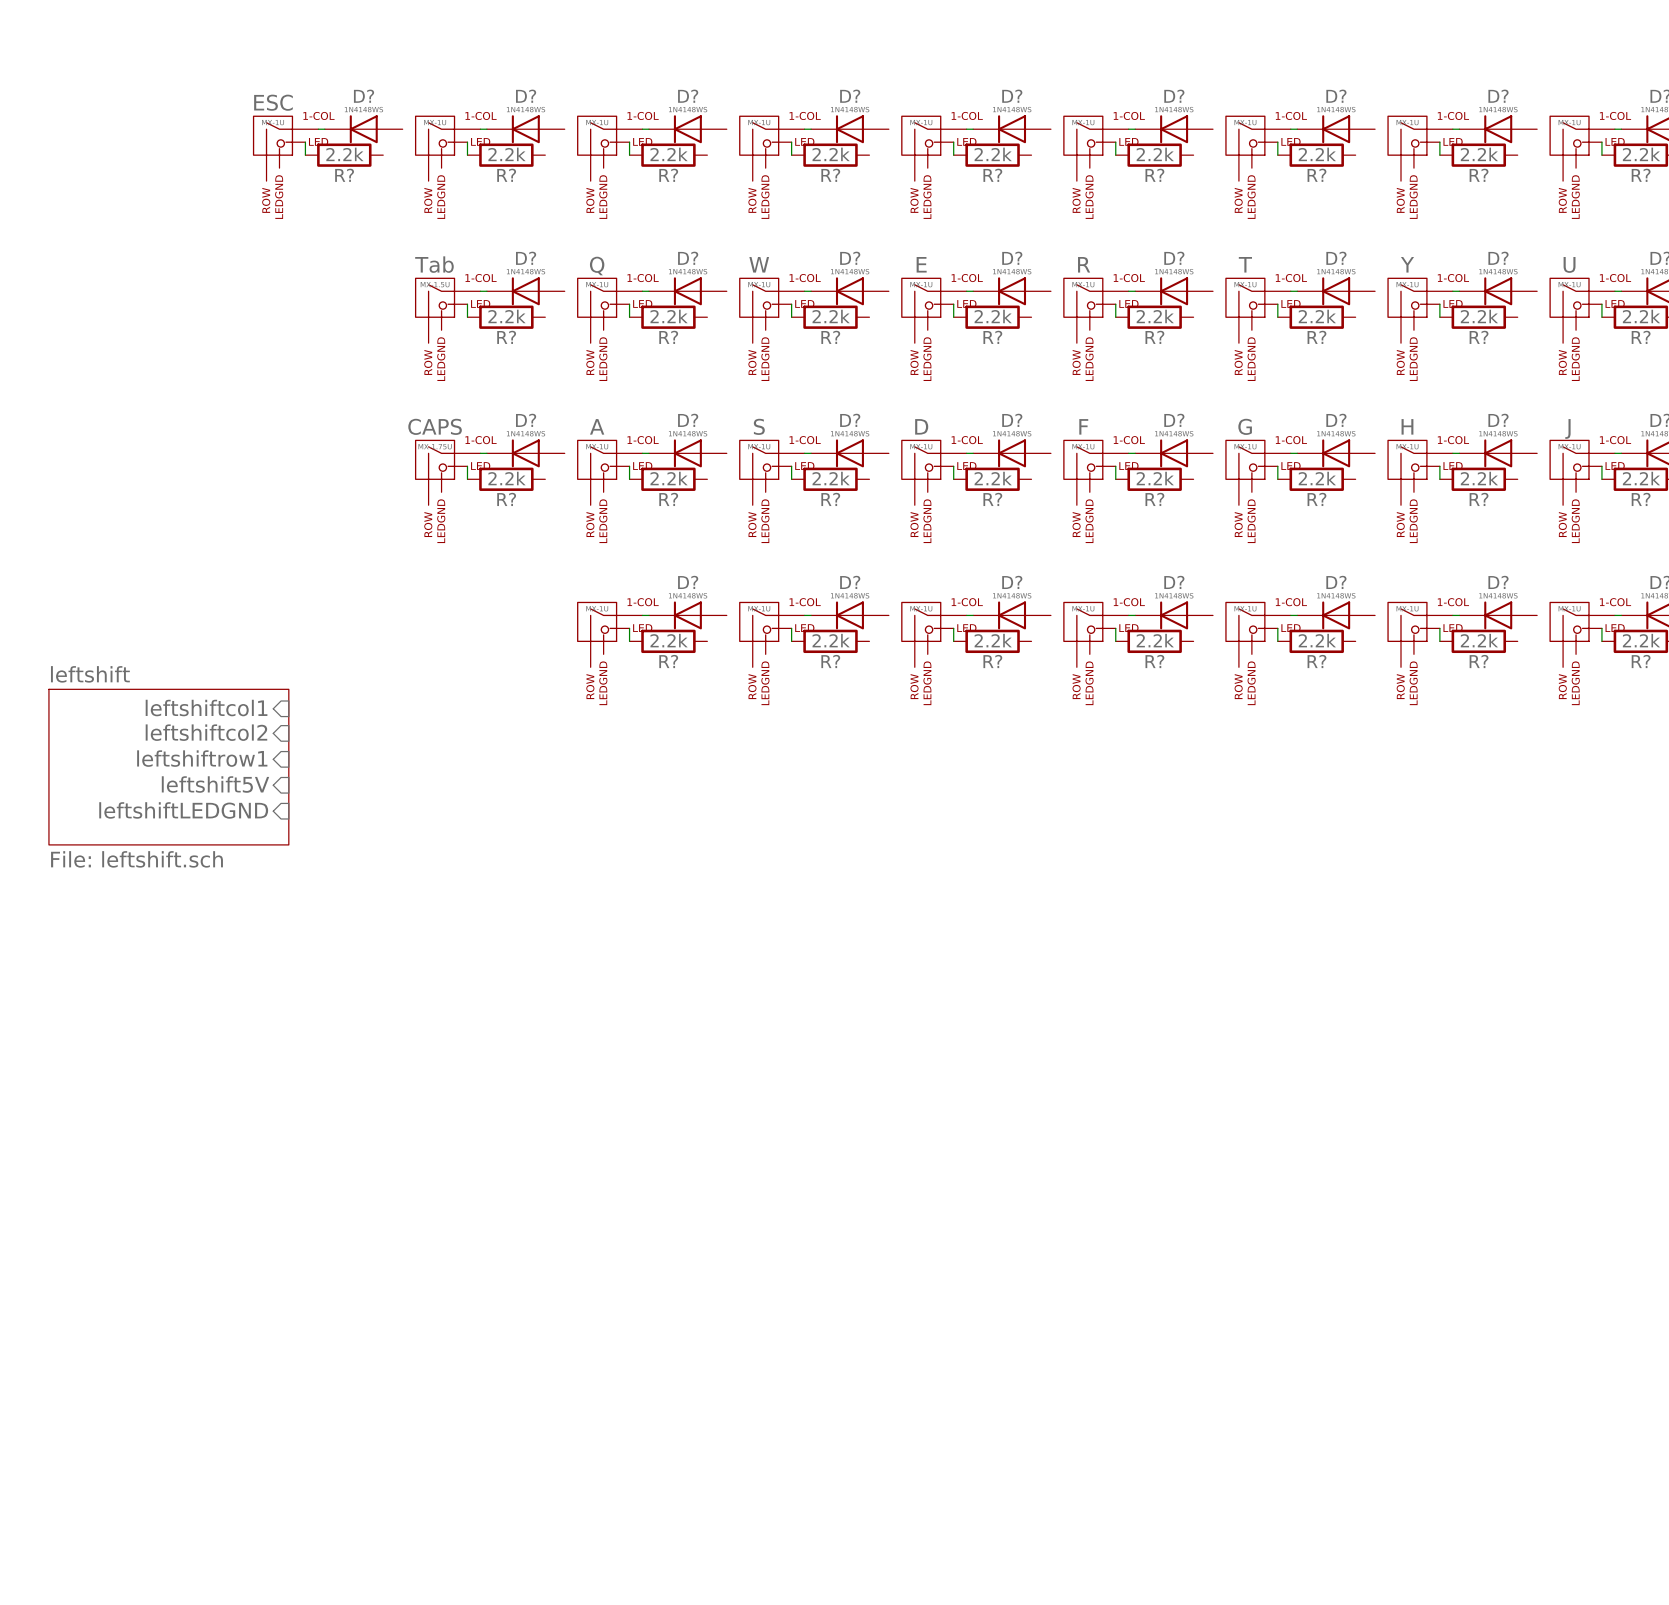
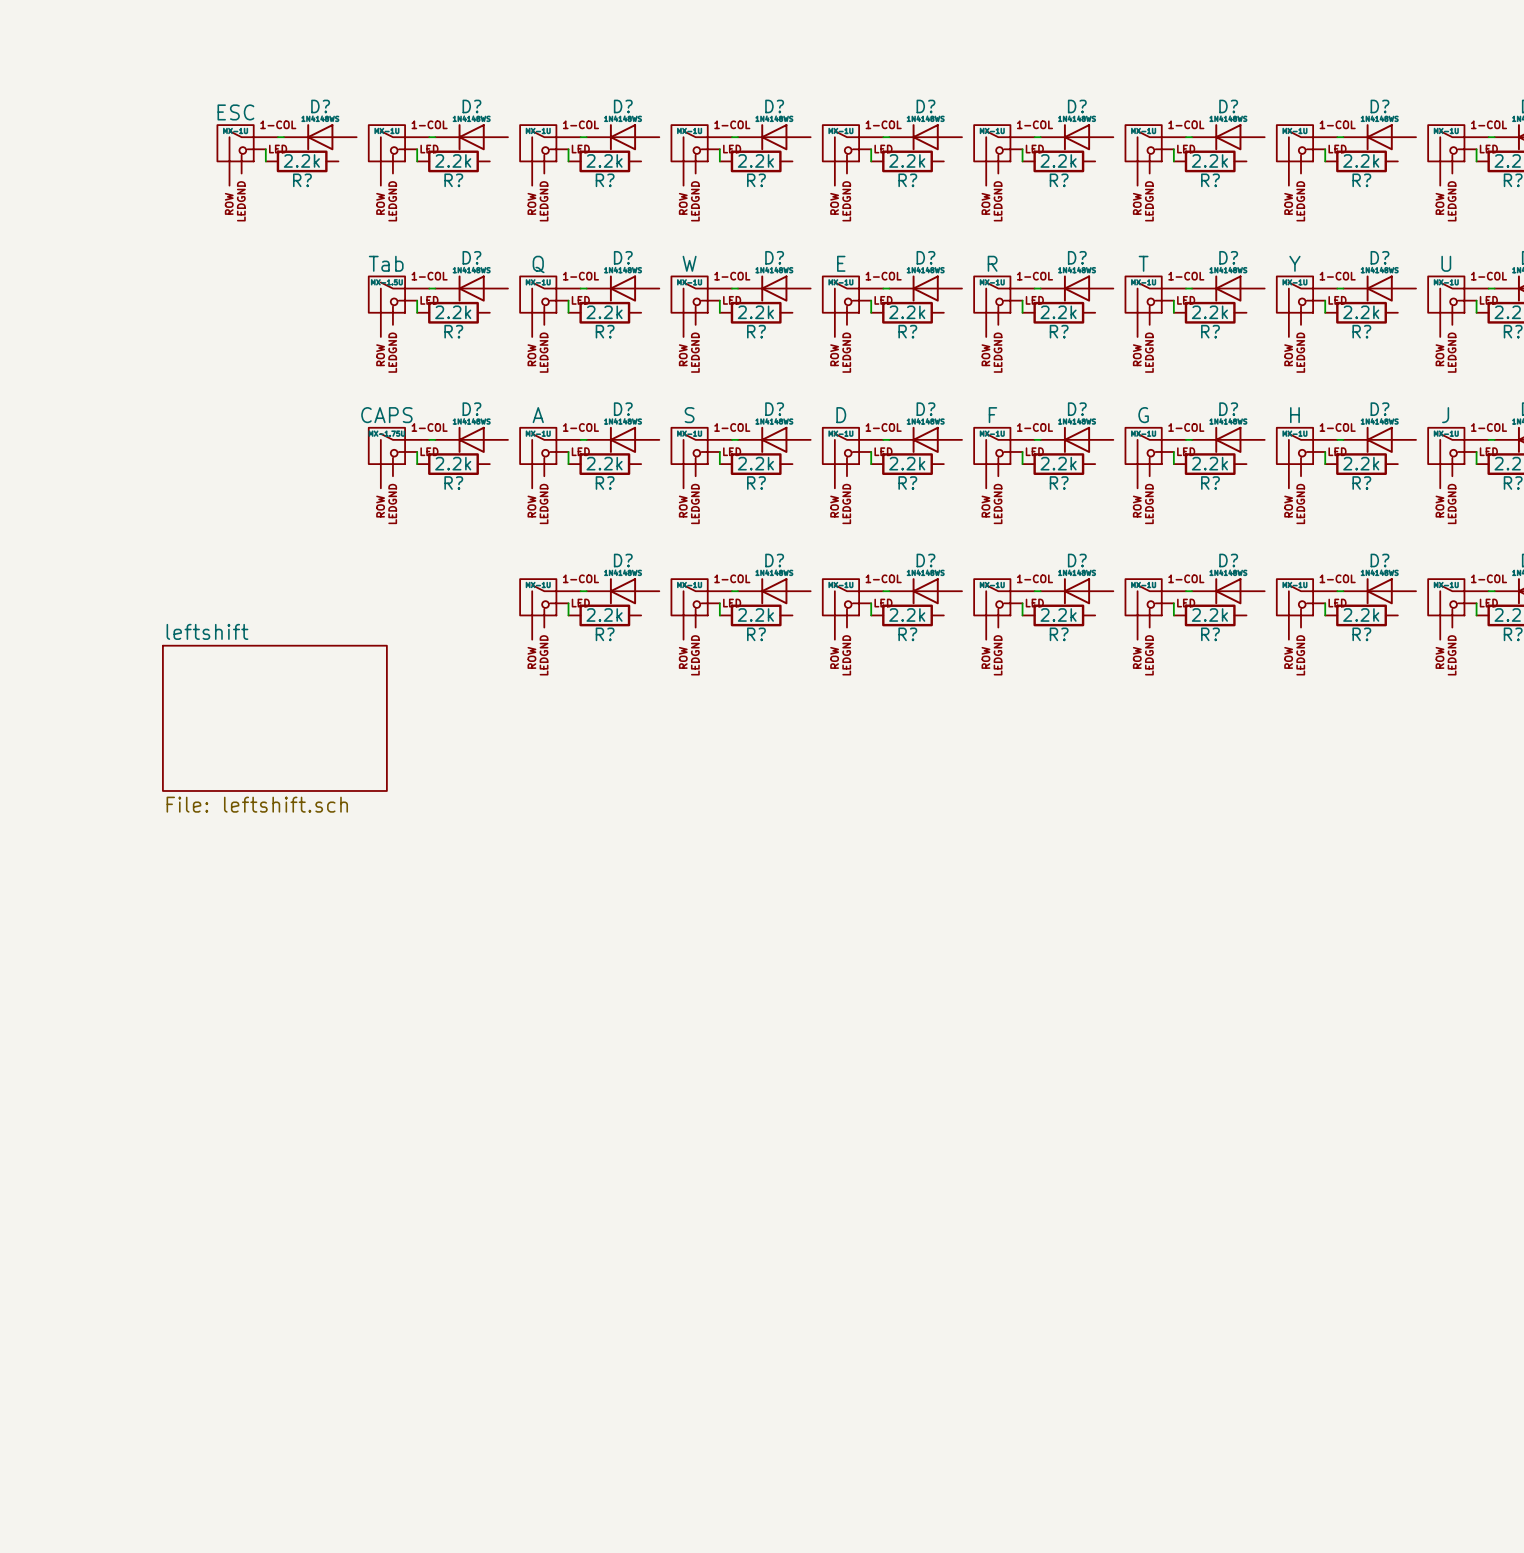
sheet pin: leftshiftcol1 (206, 708) -> none
sheet pin: leftshiftcol2 (206, 732) -> none
sheet pin: leftshiftrow1 (202, 758) -> none
sheet leftshift position: (168, 767) -> (274, 718)
sheet pin: leftshift5V (215, 784) -> none
sheet pin: leftshiftLEDGND (183, 810) -> none

